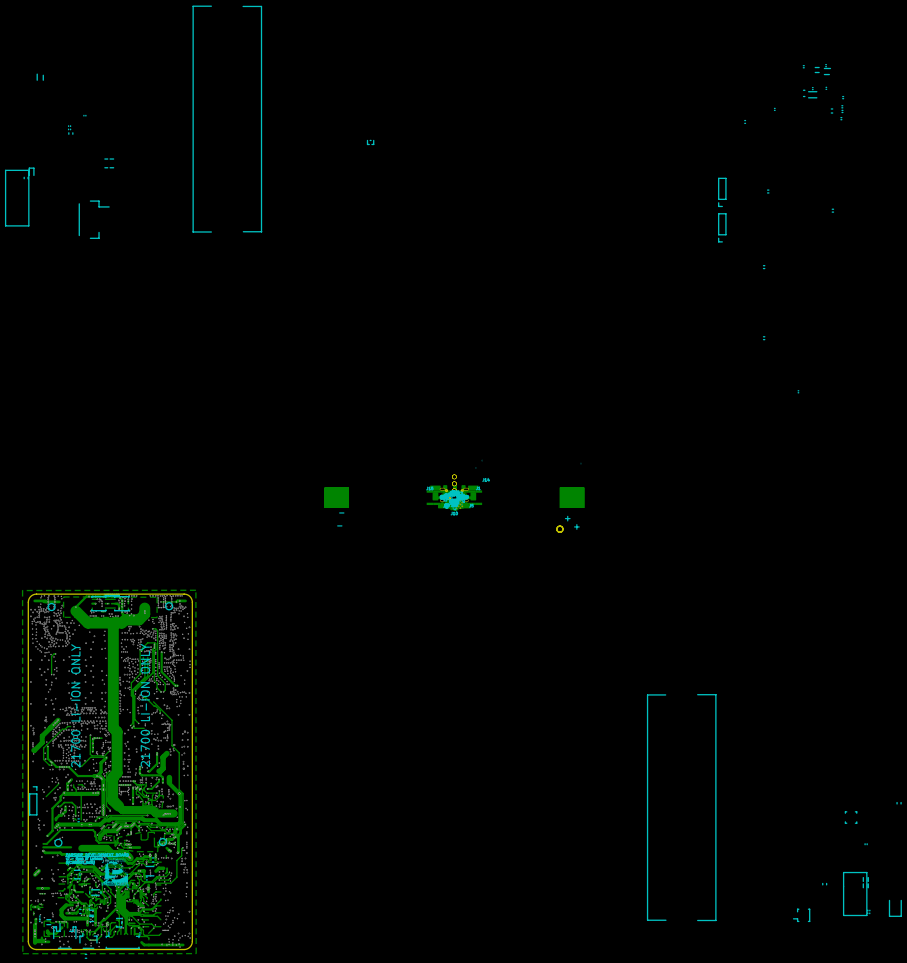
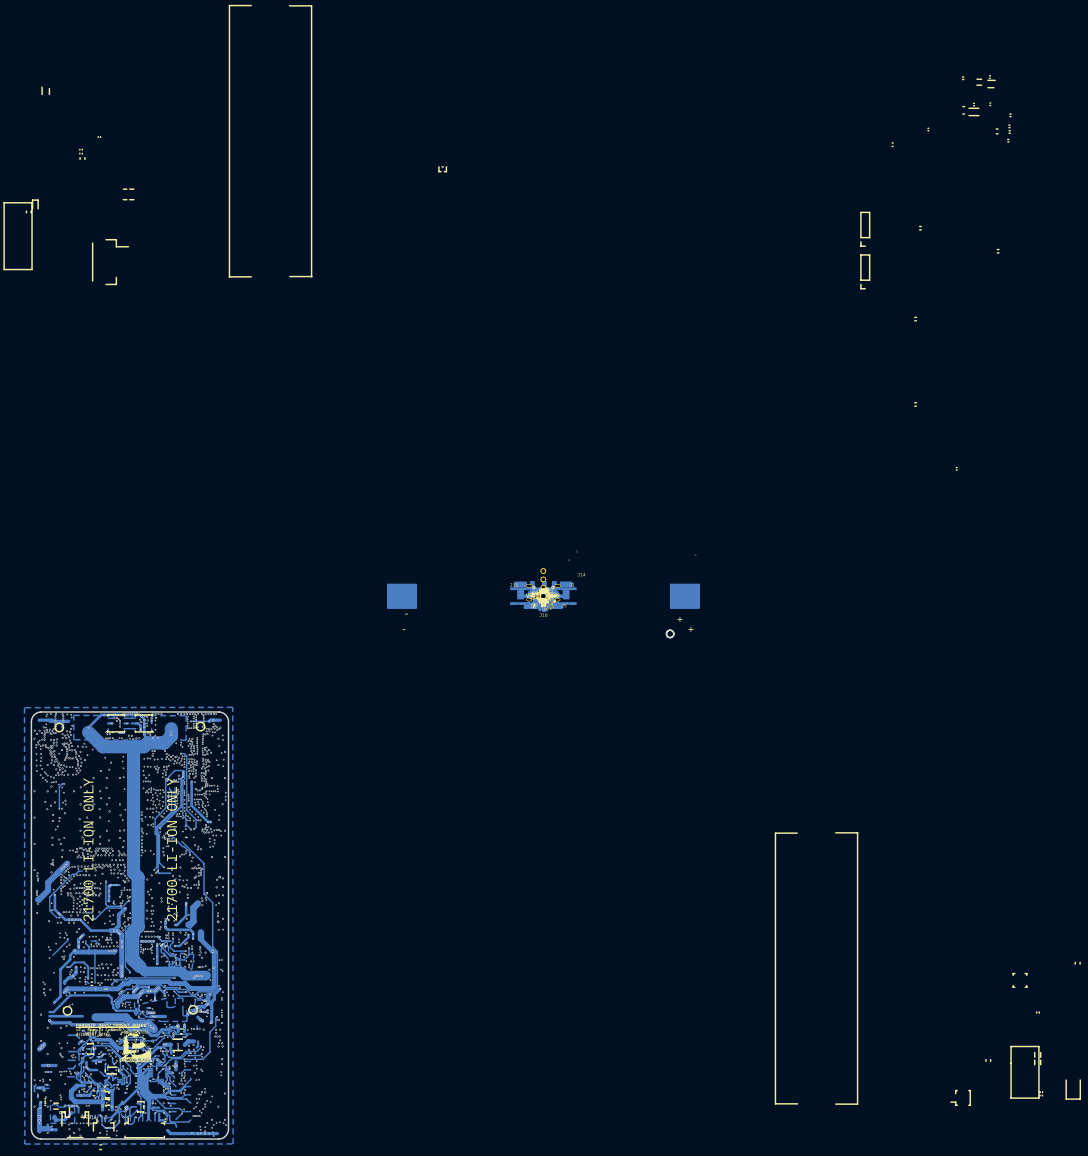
part: (243, 644) -> none

